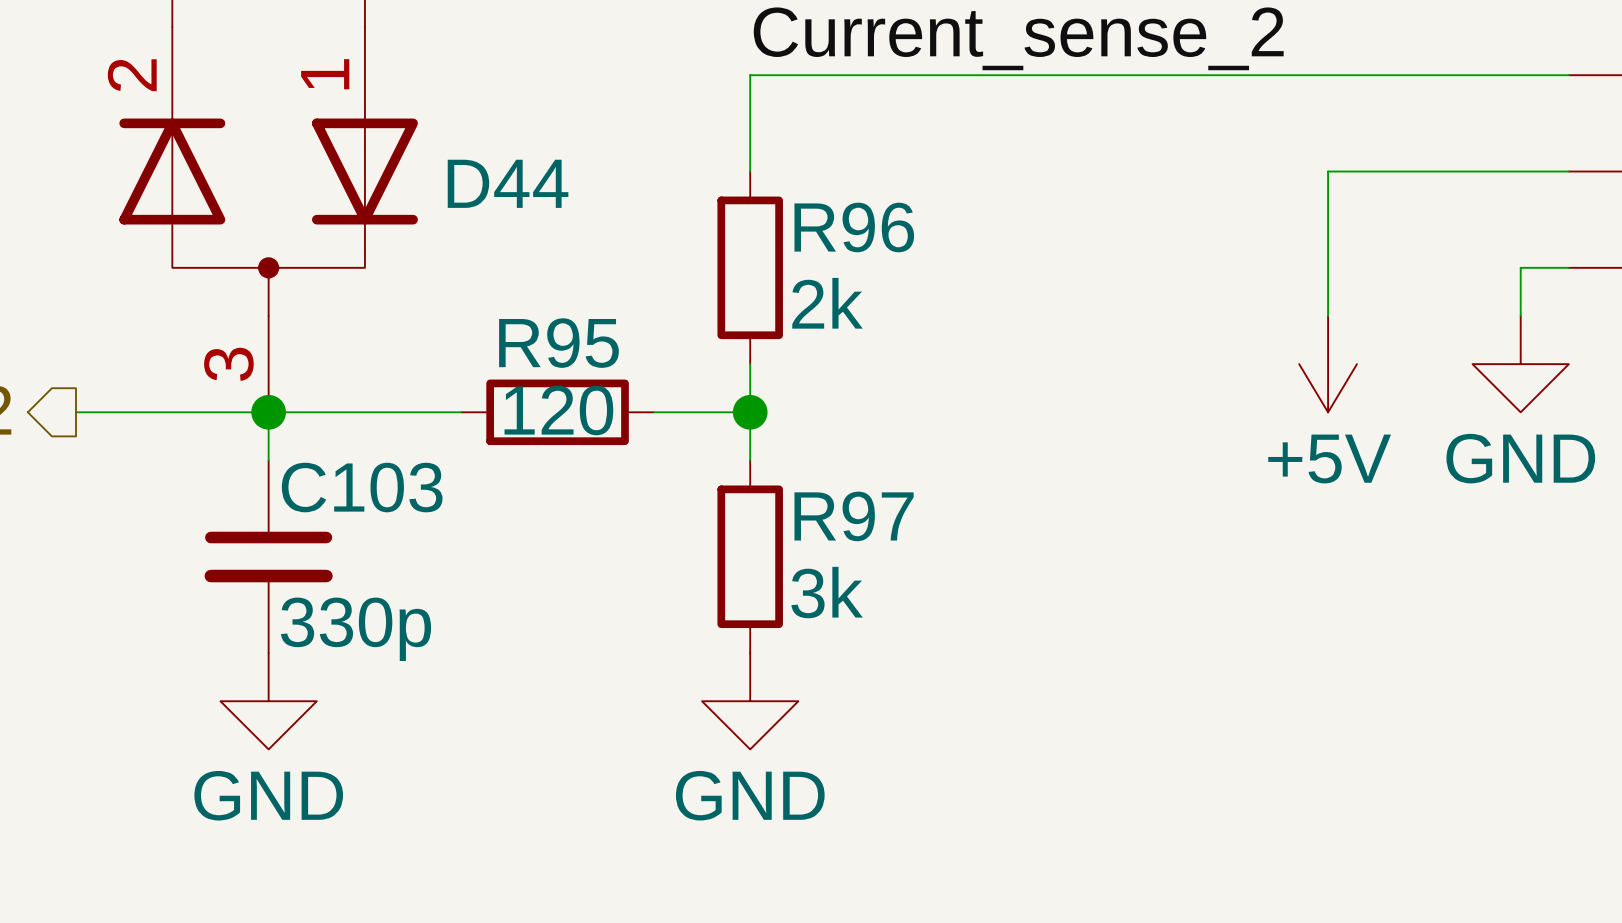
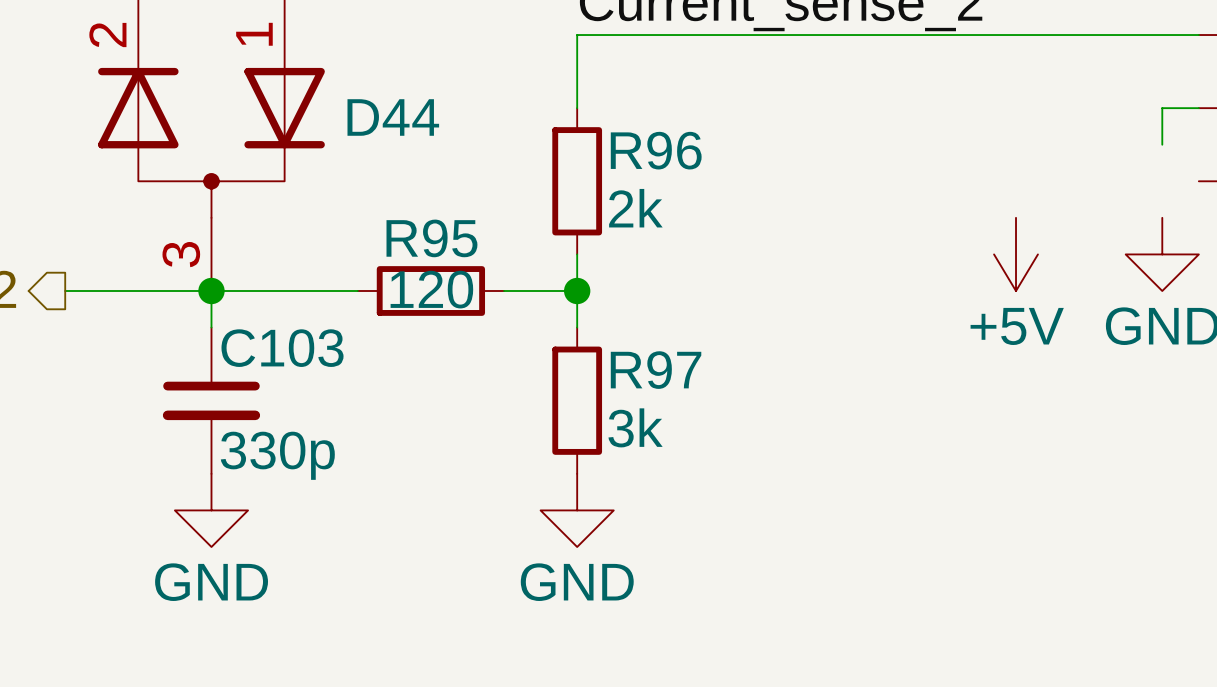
wire: (1520, 171) (1328, 171) (1328, 315) -> (1162, 108) (1162, 144)
wire: (1568, 267) (1520, 267) (1520, 315) -> none

